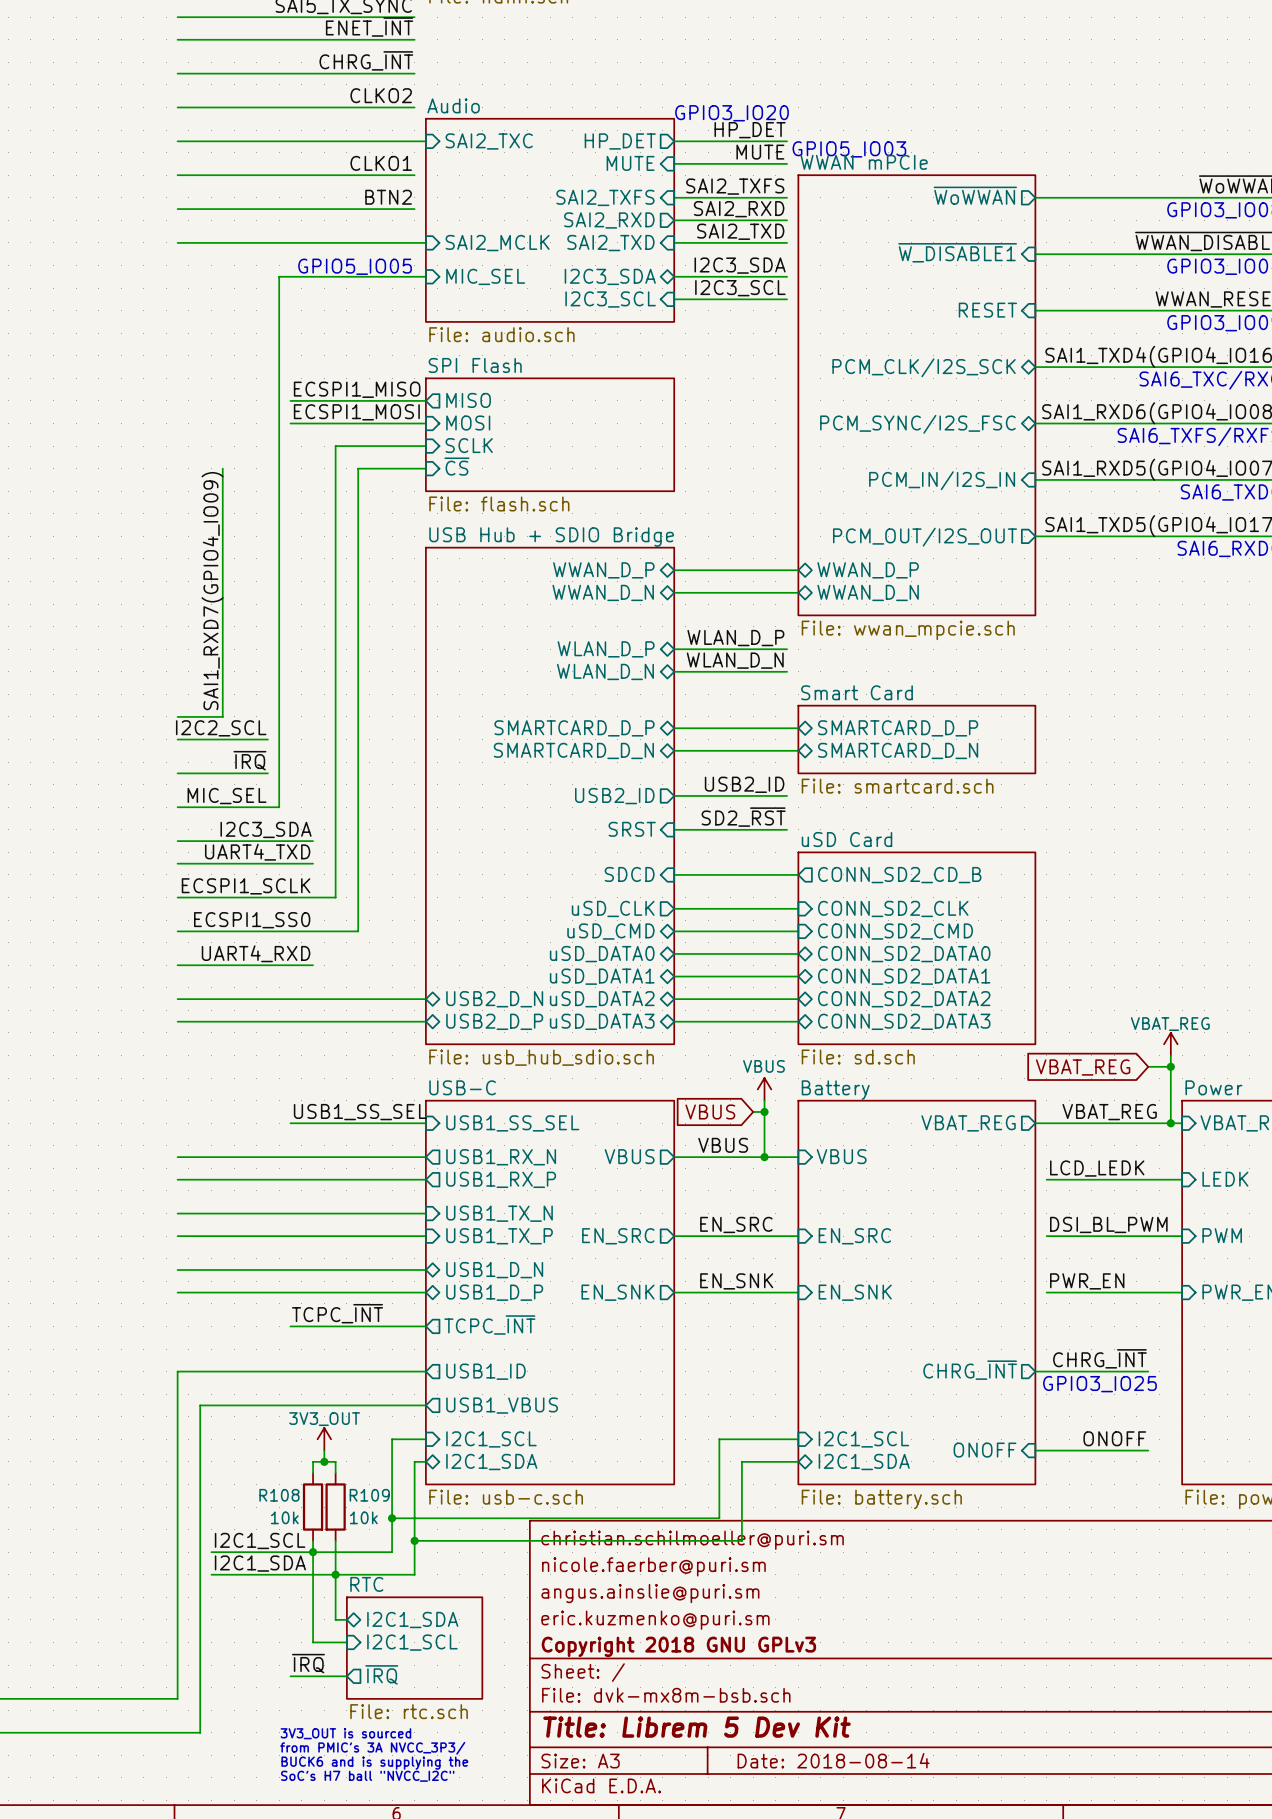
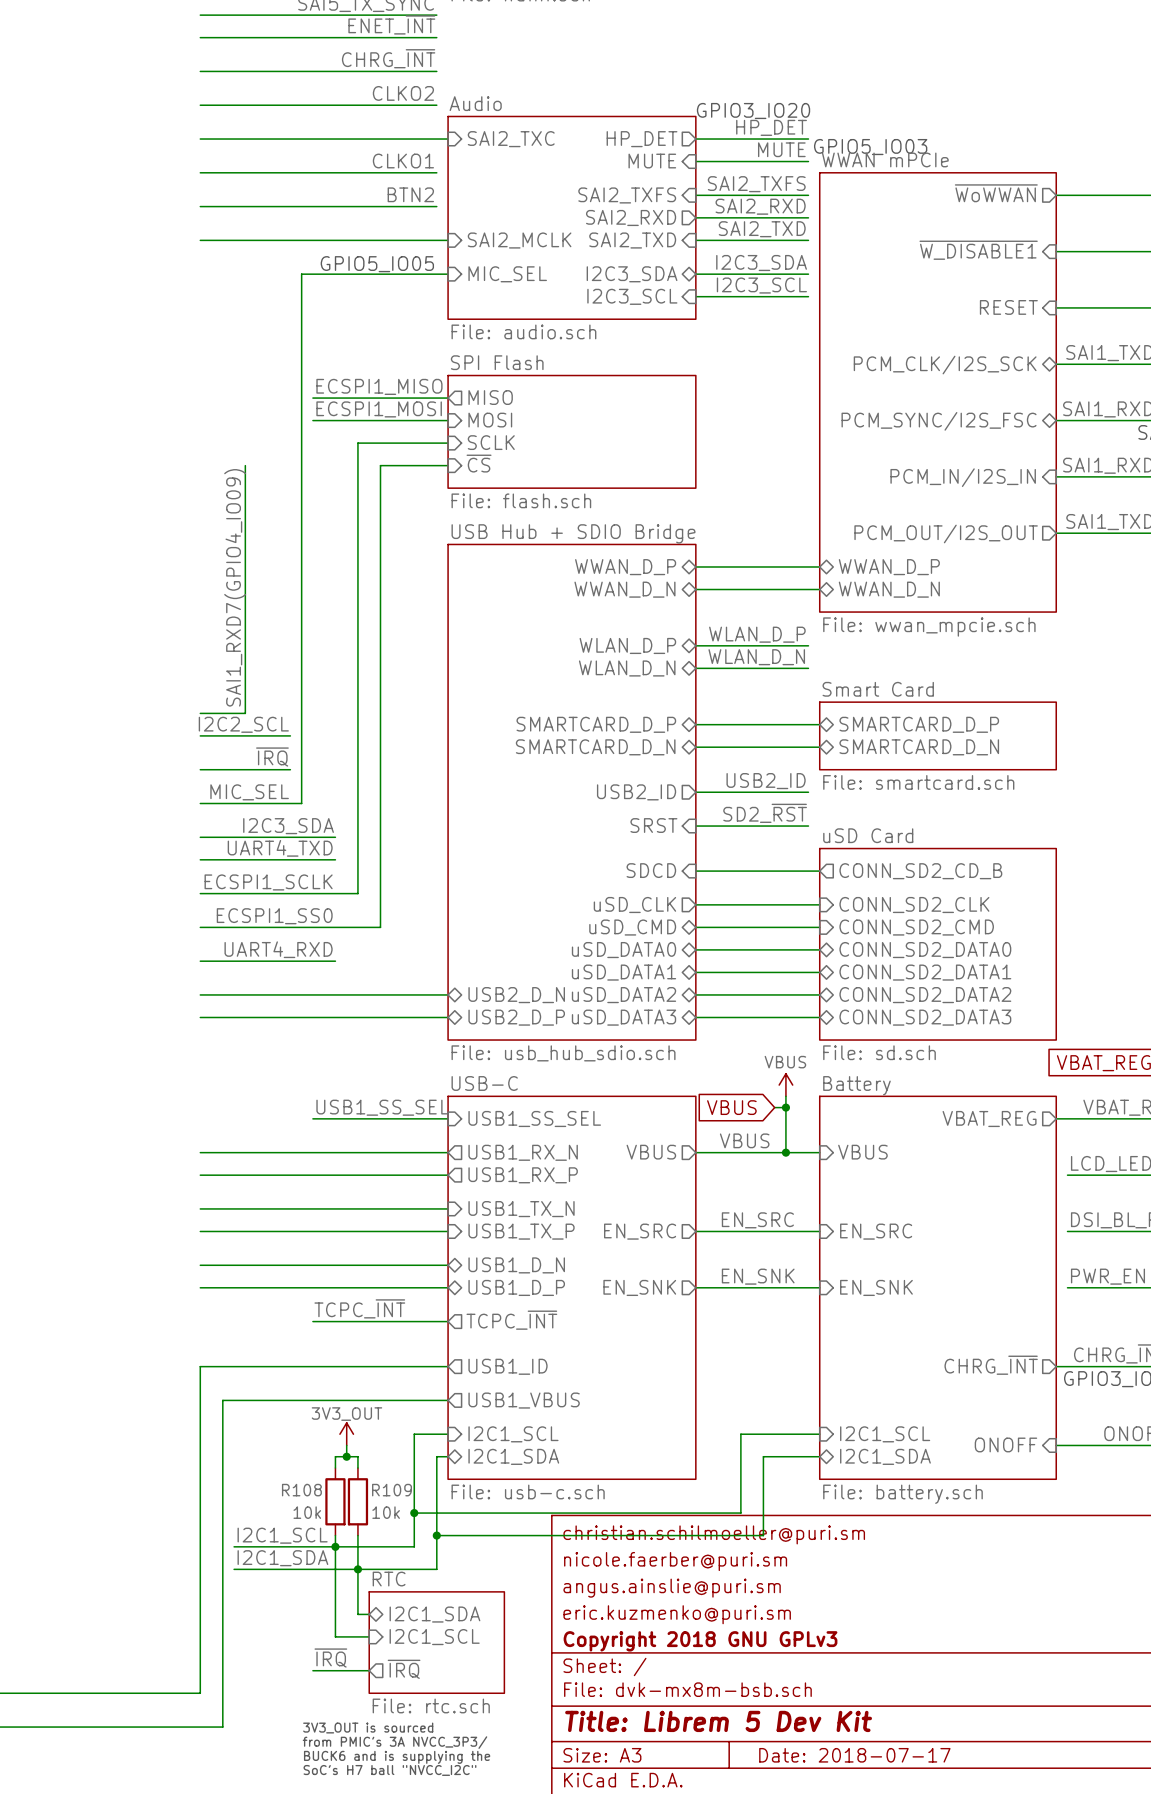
title block: Date: 2018-08-14 (833, 1760) -> Date: 2018-07-17 (854, 1755)

